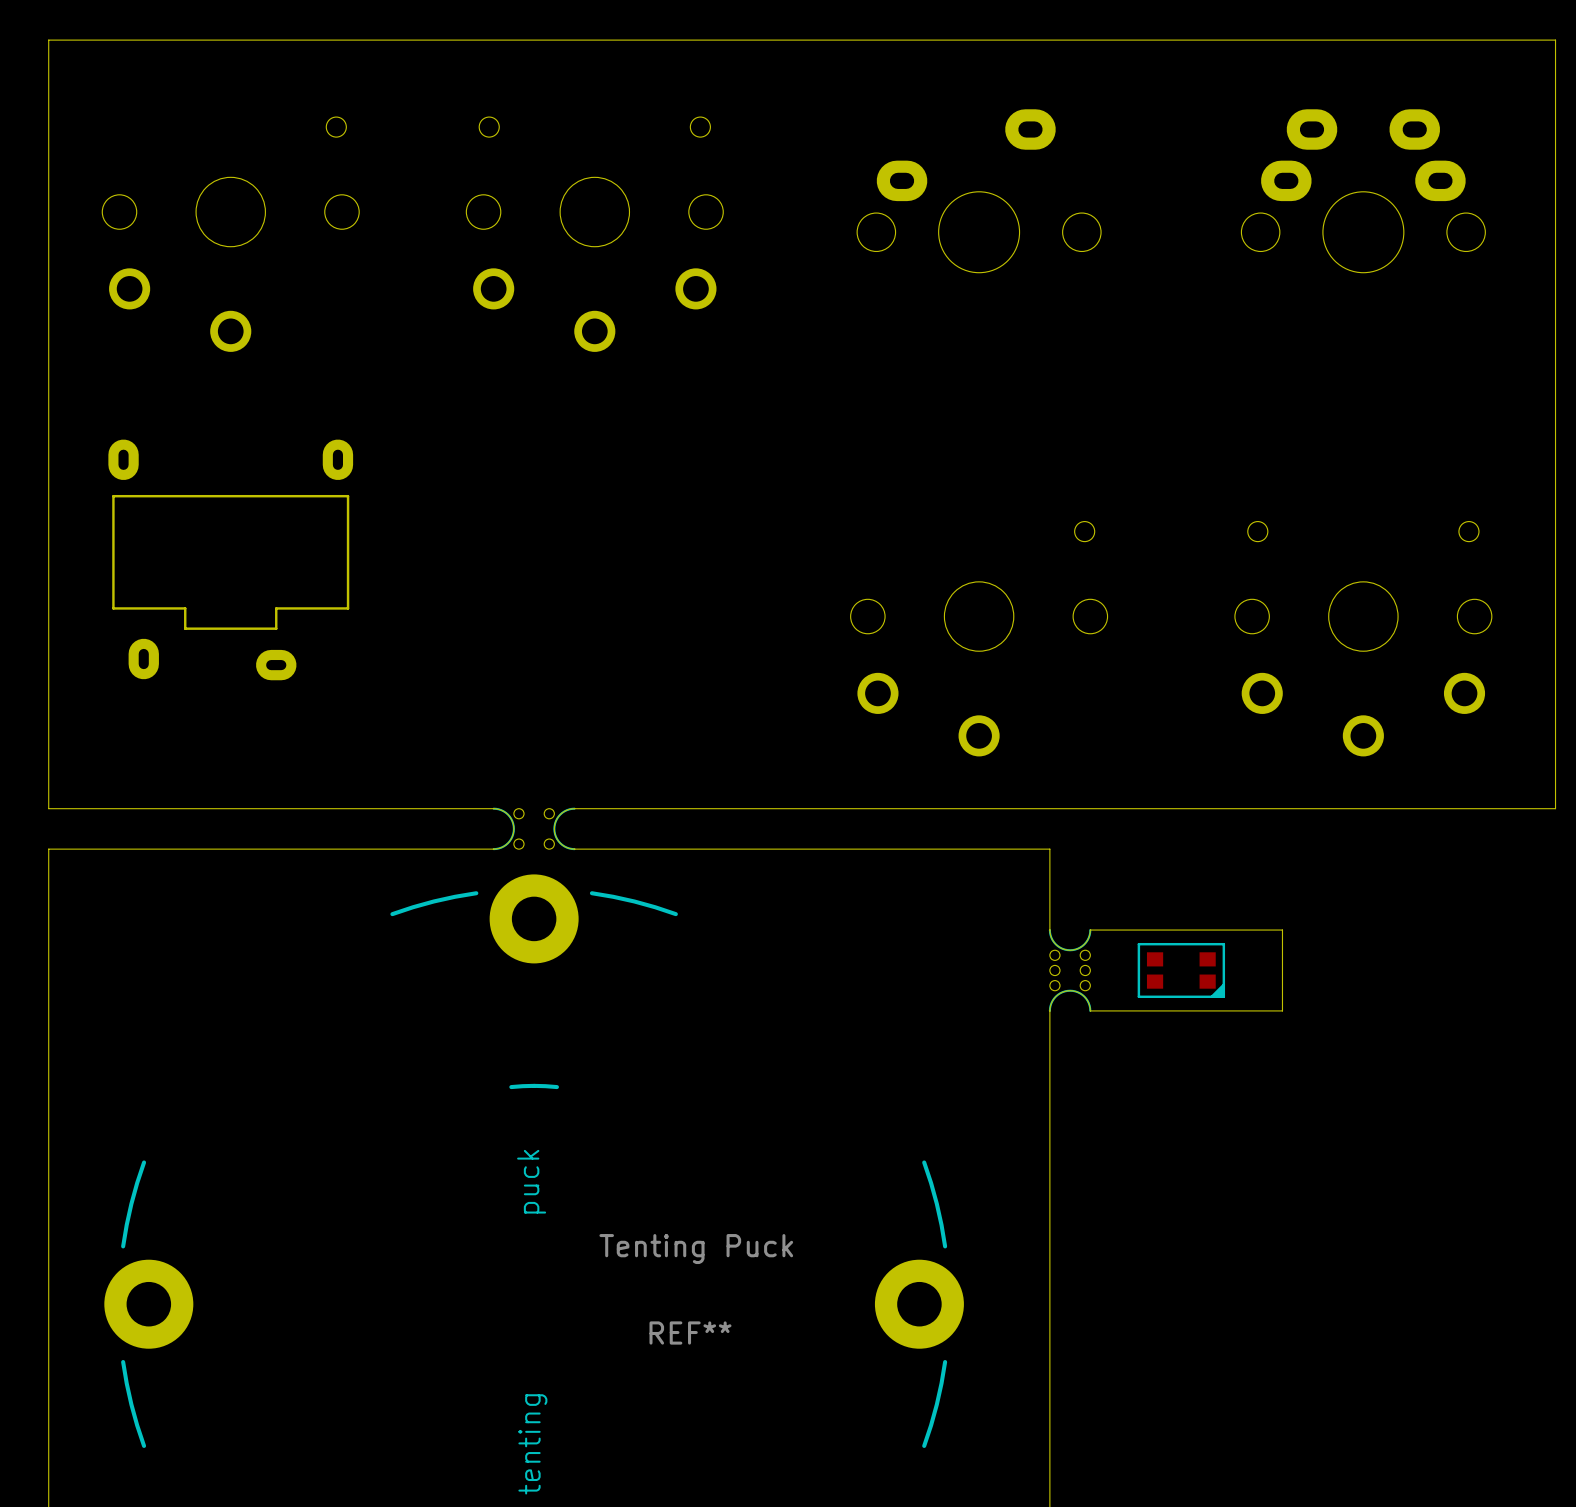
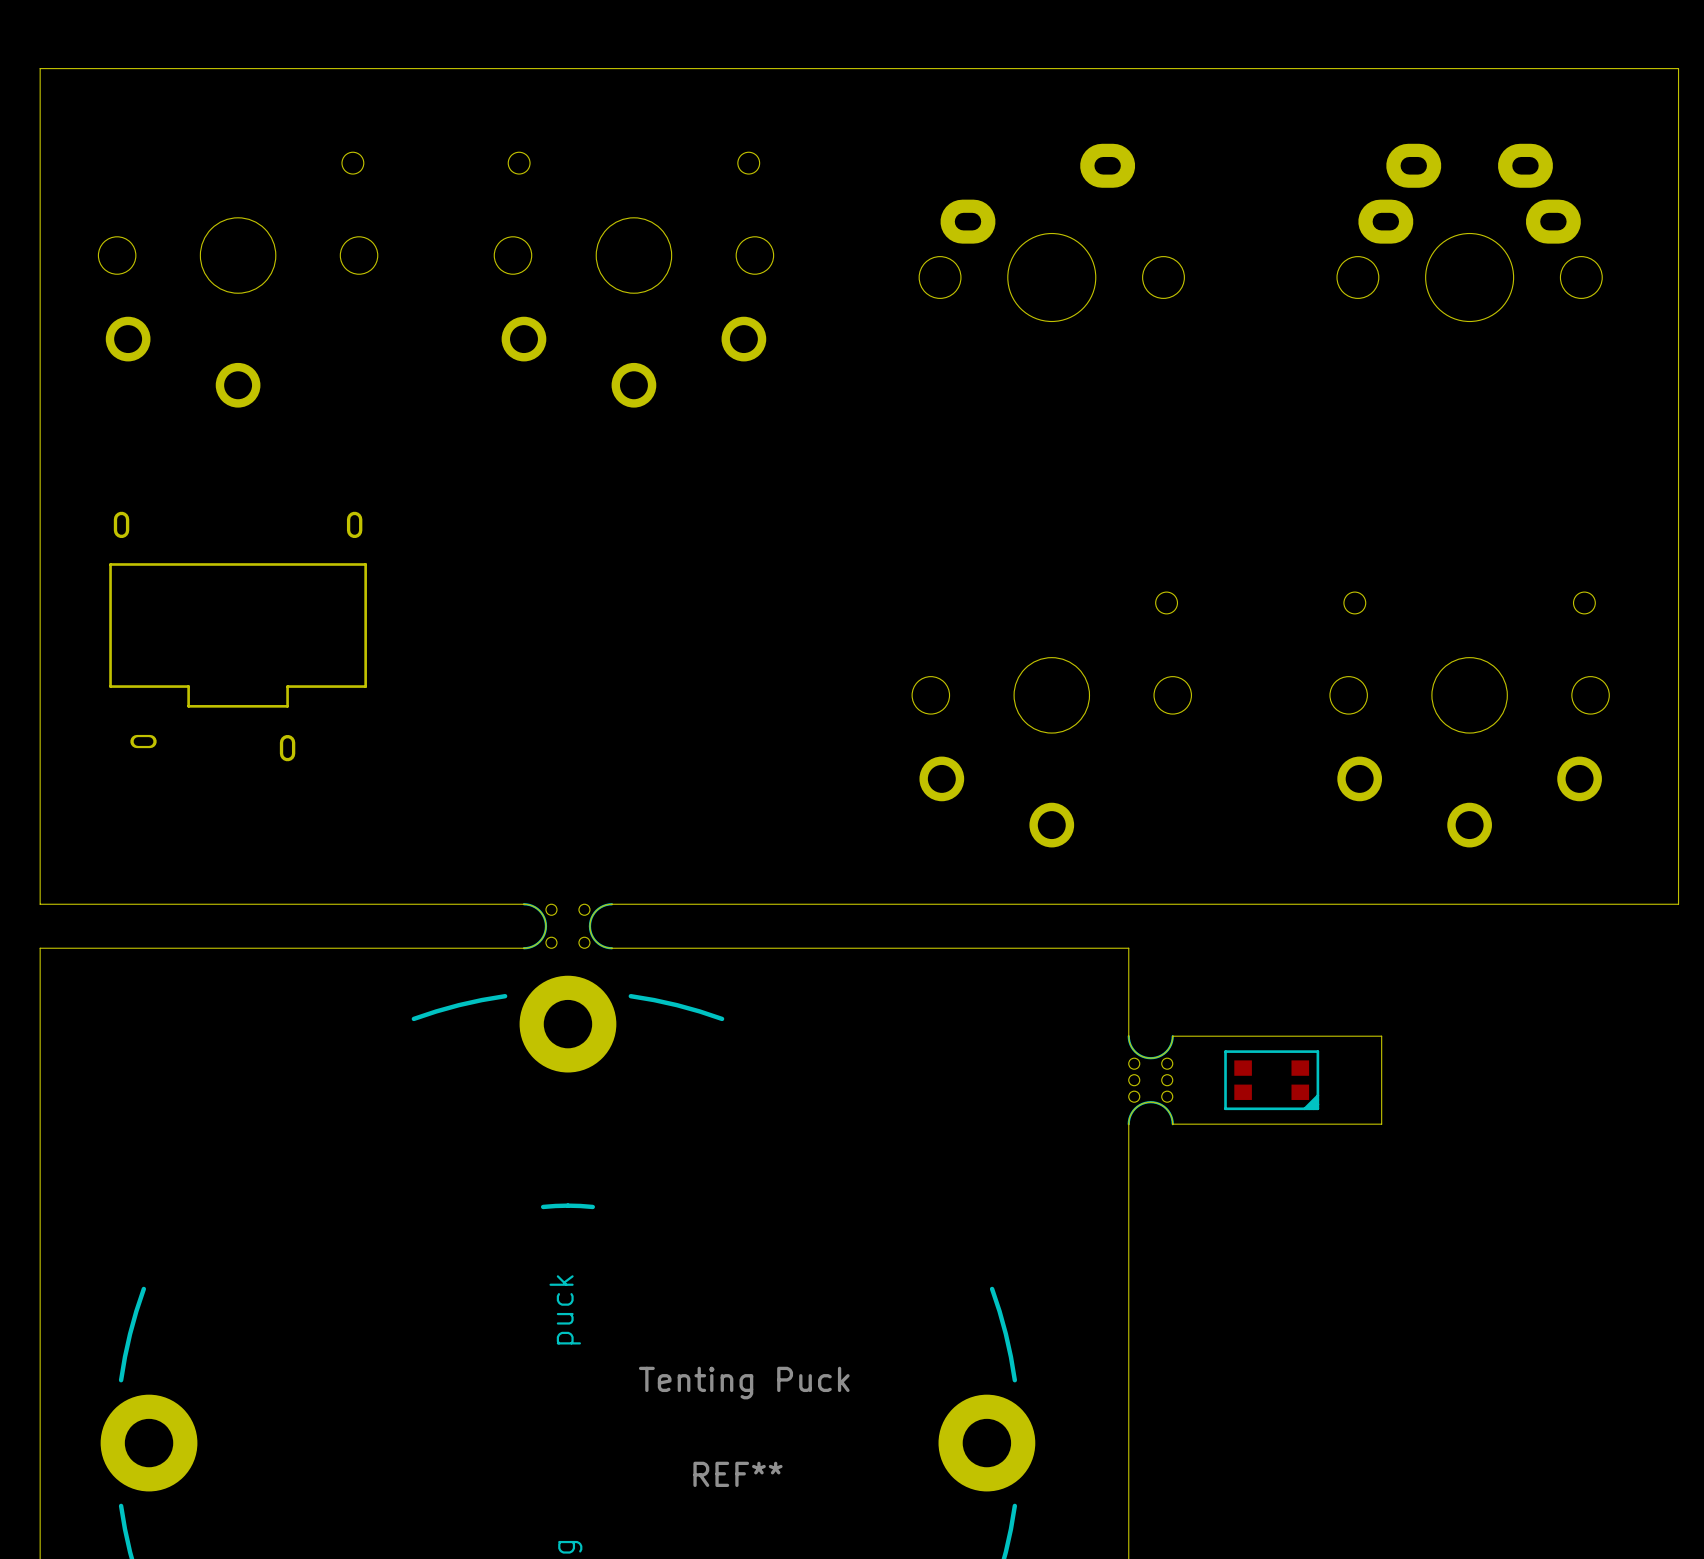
part footprint: [108, 439, 354, 681] -> [109, 511, 367, 762]

